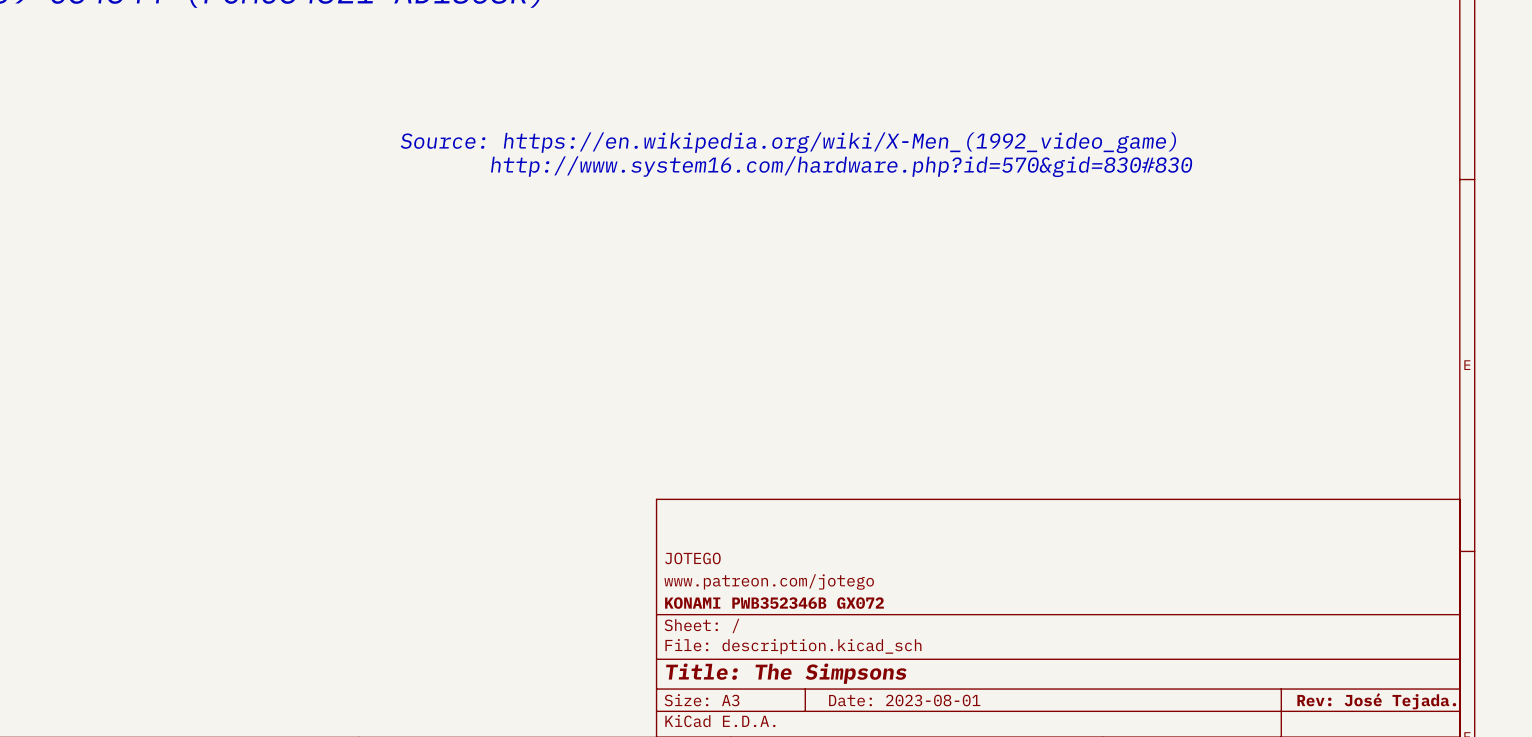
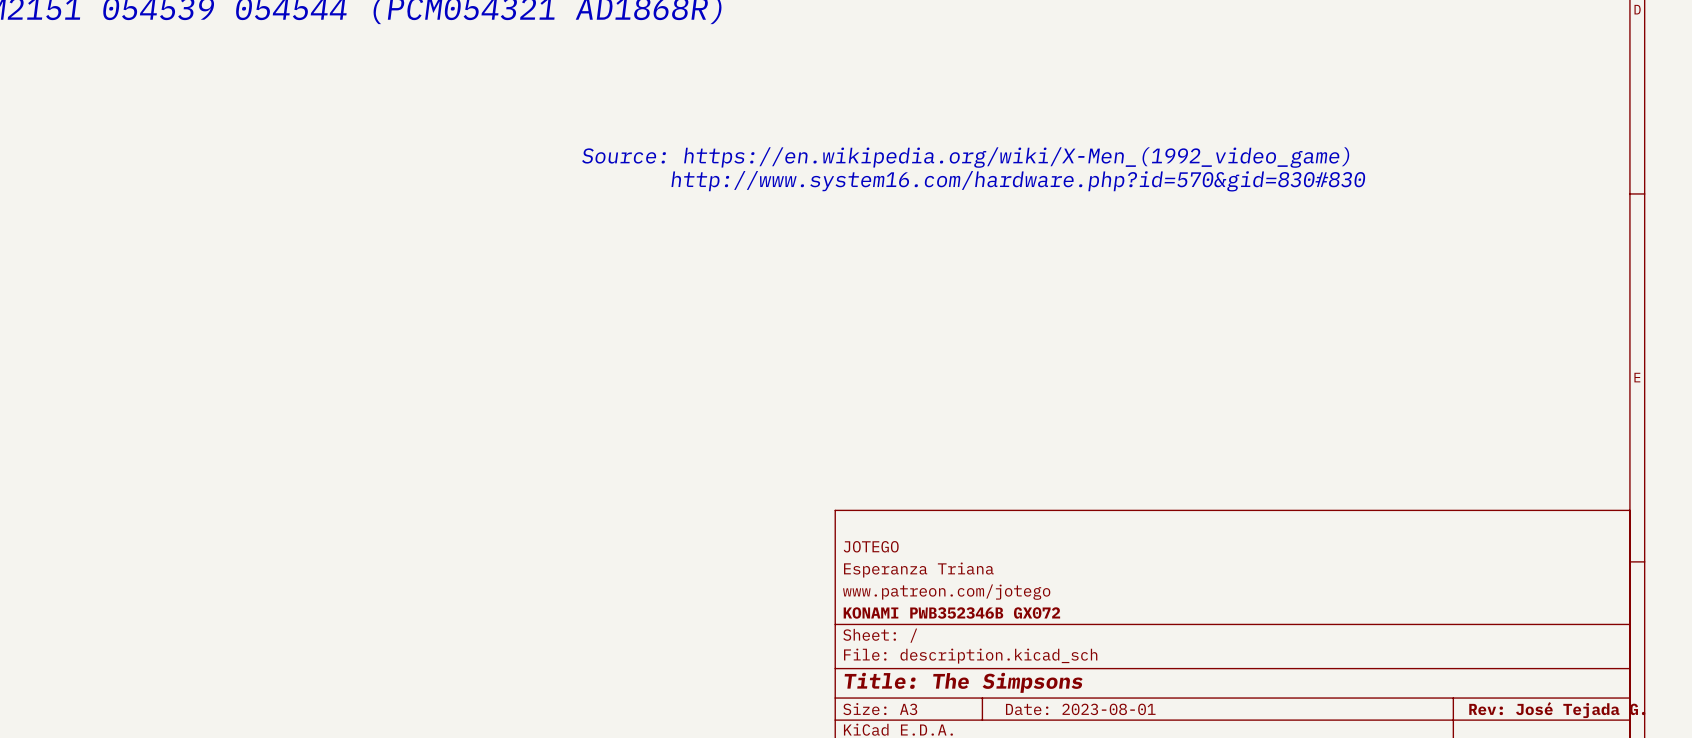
title block: none -> JOTEGO (871, 546)
title block: JOTEGO (692, 558) -> Esperanza Triana (918, 570)
title block: Rev: José Tejada. (1376, 701) -> Rev: José Tejada G. (1557, 710)

